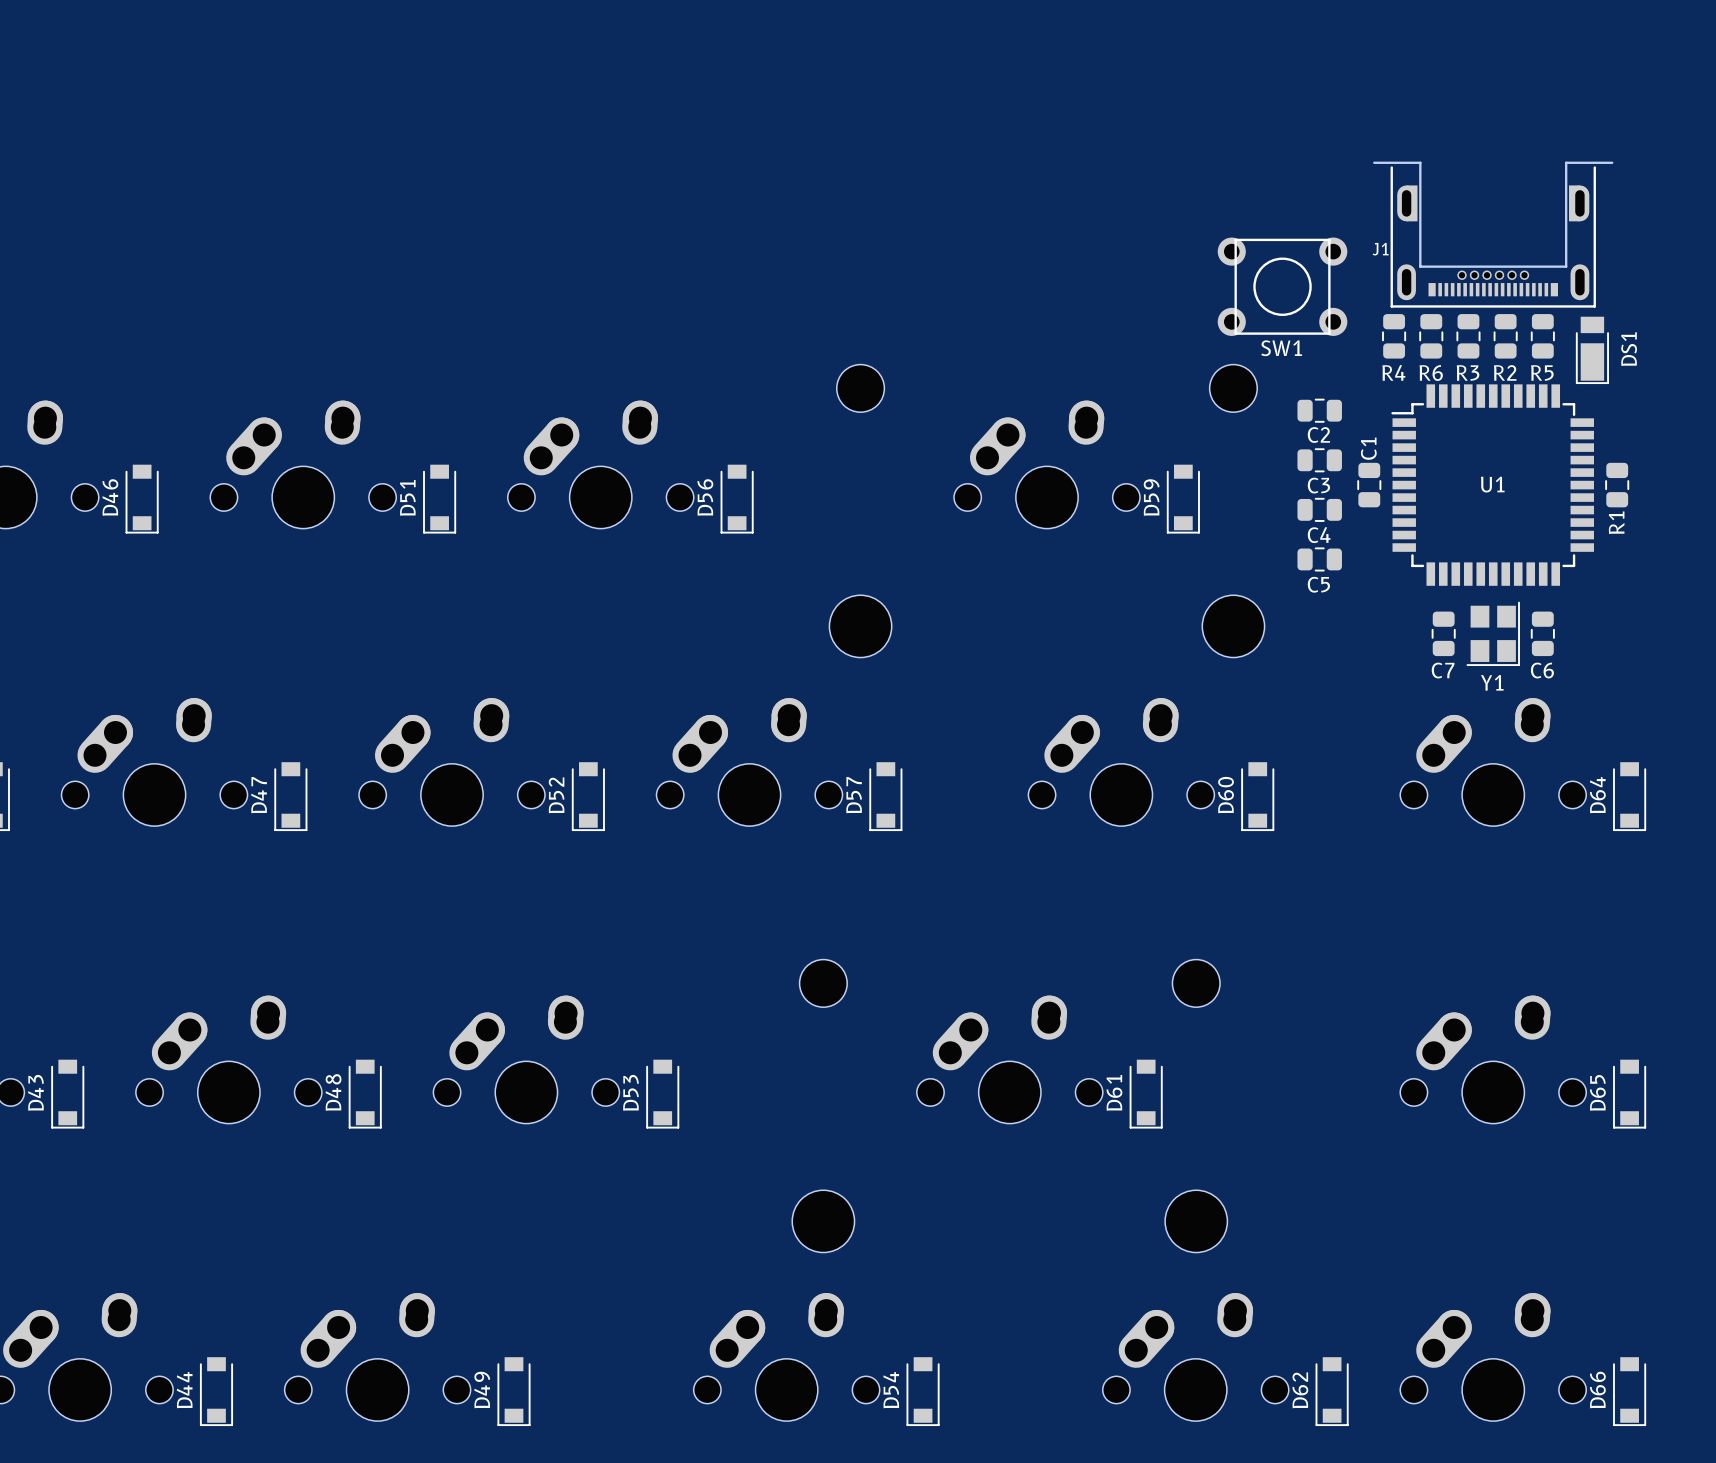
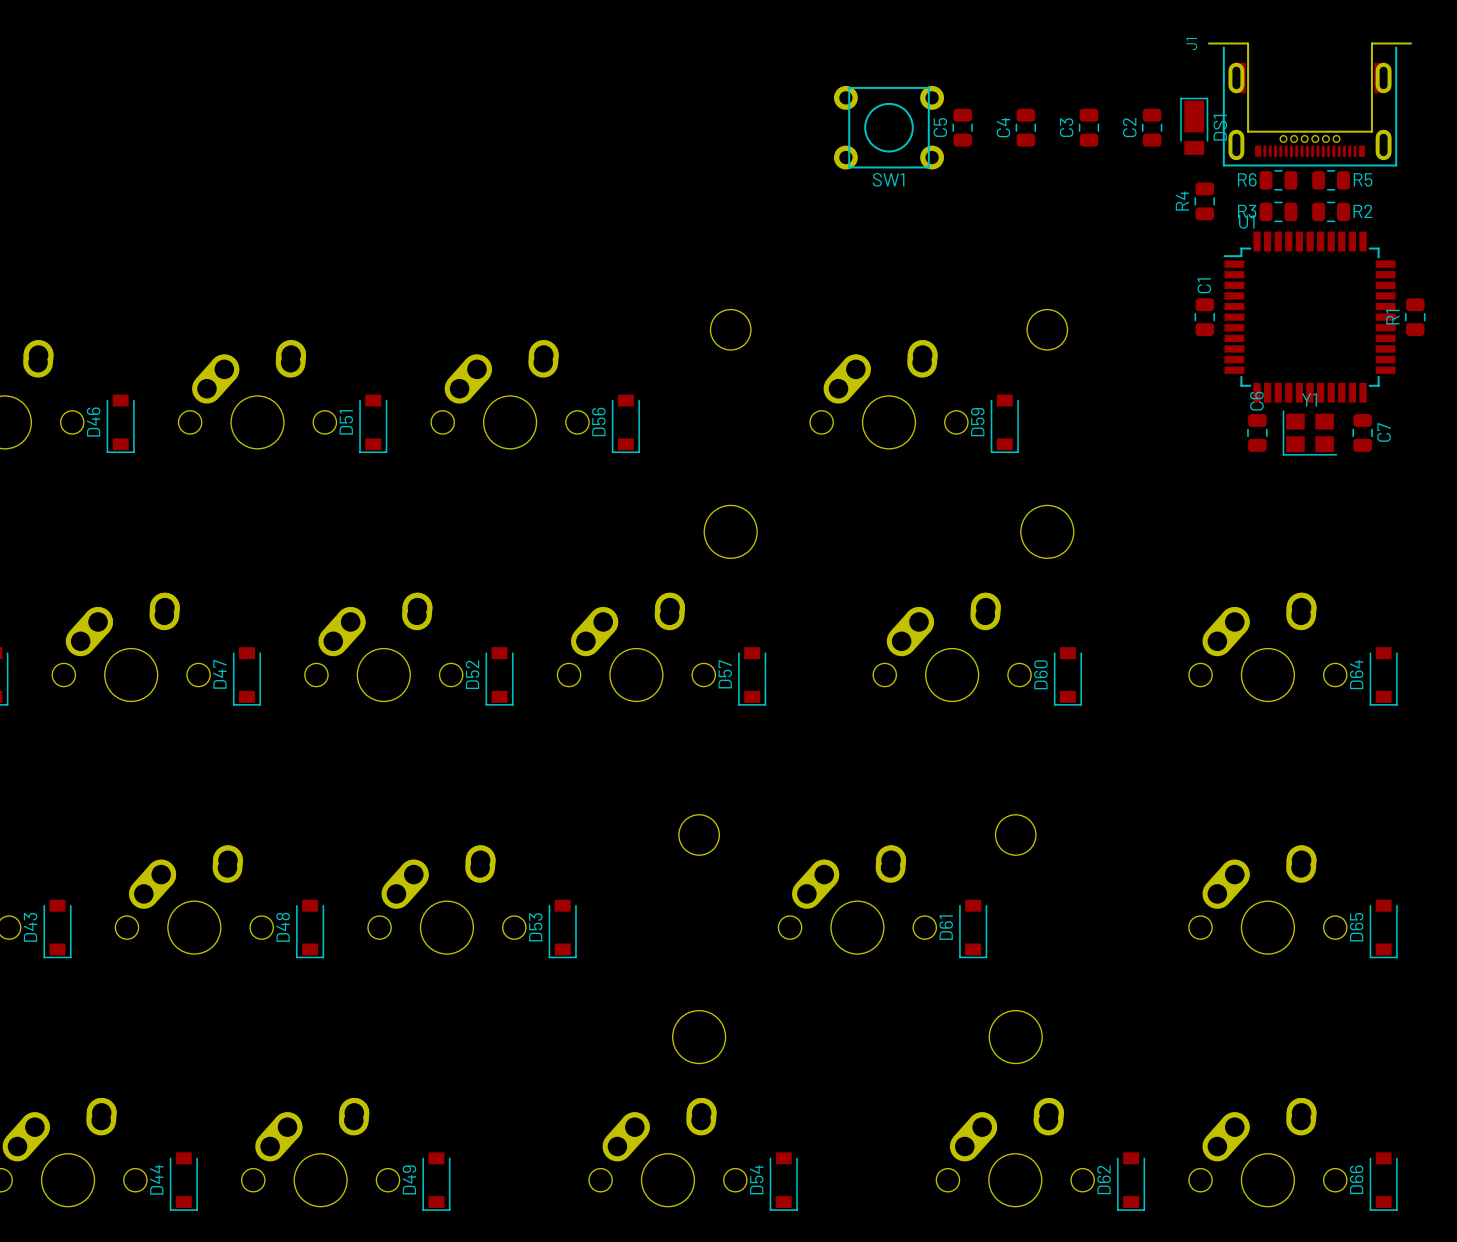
J1 position: (1493, 234) -> (1310, 104)
J1 name rotation: 0° (1380, 249) -> 90° counterclockwise (1191, 43)
J1 name position: J1 (1380, 249) -> J1 (1191, 43)
SW1 position: (1282, 286) -> (889, 127)
R4 position: (1394, 336) -> (1204, 201)
R6 rotation: 0° (1431, 336) -> 90° clockwise (1278, 180)
R6 position: (1431, 336) -> (1278, 180)
R3 rotation: 0° (1468, 336) -> 90° clockwise (1278, 211)
R3 position: (1468, 336) -> (1278, 211)
R2 rotation: 0° (1505, 336) -> 90° clockwise (1331, 211)
R2 position: (1505, 336) -> (1331, 211)
R5 rotation: 0° (1542, 336) -> 90° clockwise (1331, 180)
R5 position: (1542, 336) -> (1331, 180)
DS1 rotation: 0° (1592, 350) -> 180° (1194, 126)
DS1 position: (1592, 350) -> (1194, 126)
R4 name rotation: 0° (1393, 372) -> 90° counterclockwise (1182, 201)
R4 name position: R4 (1393, 372) -> R4 (1182, 201)
R2 name position: R2 (1505, 372) -> R2 (1362, 211)
R5 name position: R5 (1542, 372) -> R5 (1363, 179)
C2 rotation: 0° (1319, 410) -> 90° clockwise (1152, 127)
C2 position: (1319, 410) -> (1152, 127)
C3 rotation: 0° (1319, 460) -> 90° clockwise (1088, 127)
C3 position: (1319, 460) -> (1088, 127)
U1 name position: U1 (1492, 484) -> U1 (1246, 222)
C1 position: (1369, 485) -> (1204, 317)
U1 position: (1492, 485) -> (1309, 317)
R1 position: (1617, 485) -> (1415, 317)
C4 rotation: 0° (1319, 509) -> 90° clockwise (1025, 127)
C4 position: (1319, 509) -> (1025, 127)
R1 name position: R1 (1616, 522) -> R1 (1392, 317)
C5 rotation: 0° (1319, 559) -> 90° clockwise (962, 127)
C5 position: (1319, 559) -> (962, 127)
C7 position: (1443, 633) -> (1362, 432)
Y1 rotation: 0° (1493, 633) -> 90° clockwise (1310, 432)
Y1 position: (1493, 633) -> (1310, 432)
C6 position: (1542, 633) -> (1257, 432)
C7 name rotation: 0° (1443, 670) -> 90° counterclockwise (1384, 432)
C7 name position: C7 (1443, 670) -> C7 (1384, 432)
C6 name rotation: 0° (1542, 670) -> 90° counterclockwise (1256, 401)
C6 name position: C6 (1542, 670) -> C6 (1256, 401)
Y1 name position: Y1 (1492, 682) -> Y1 (1309, 399)

